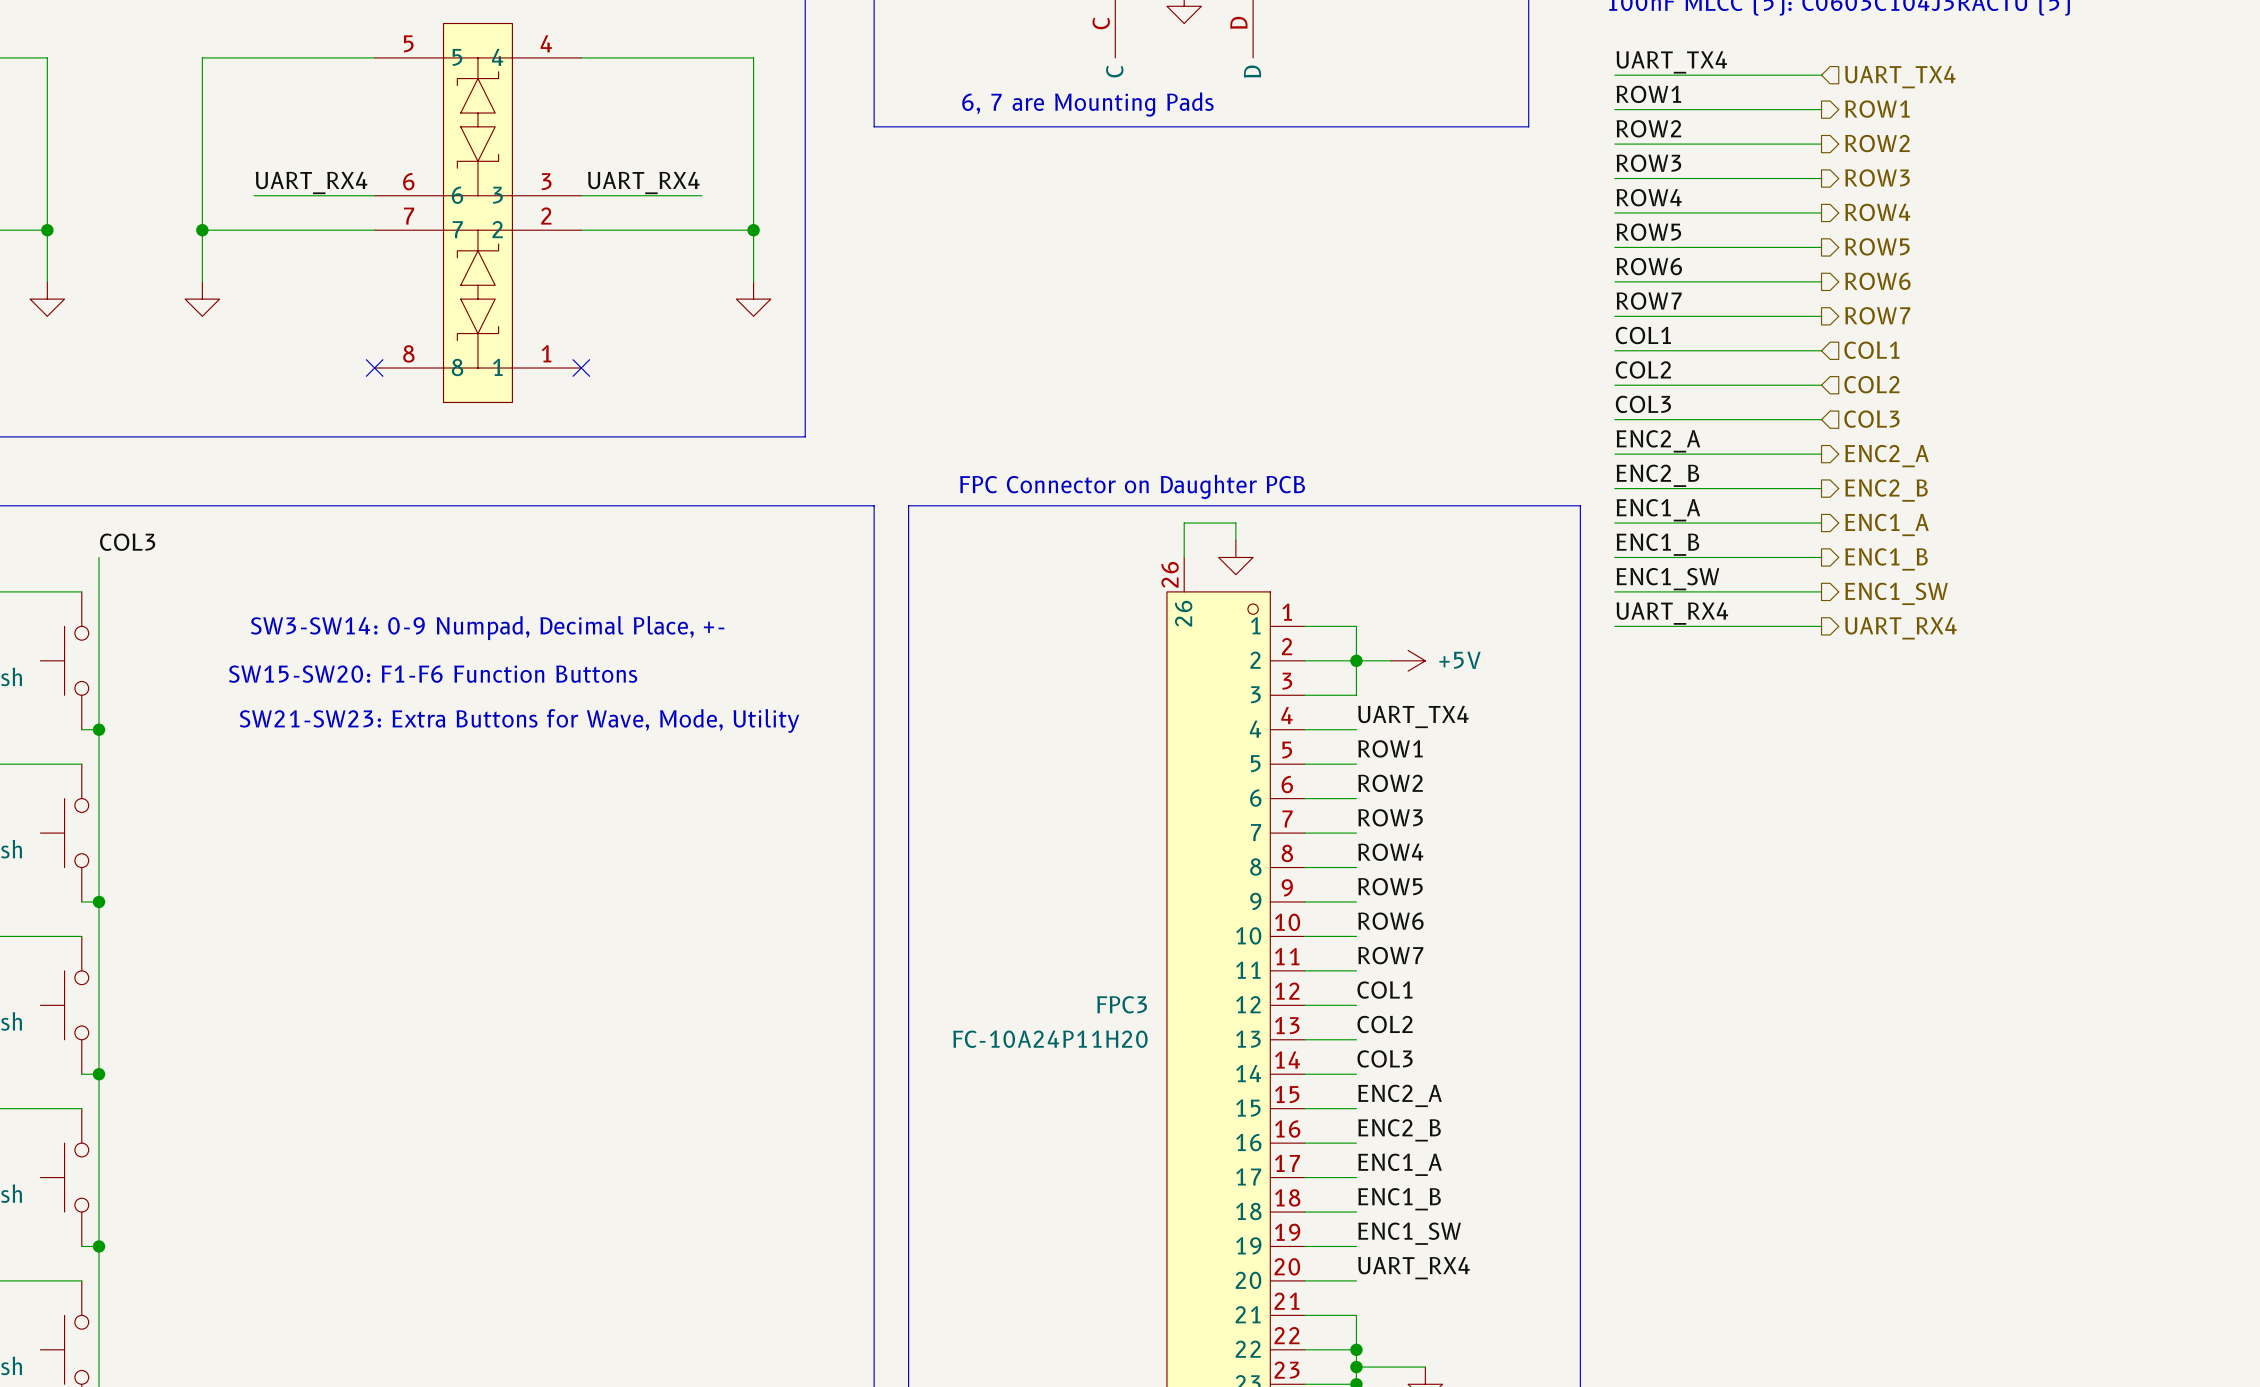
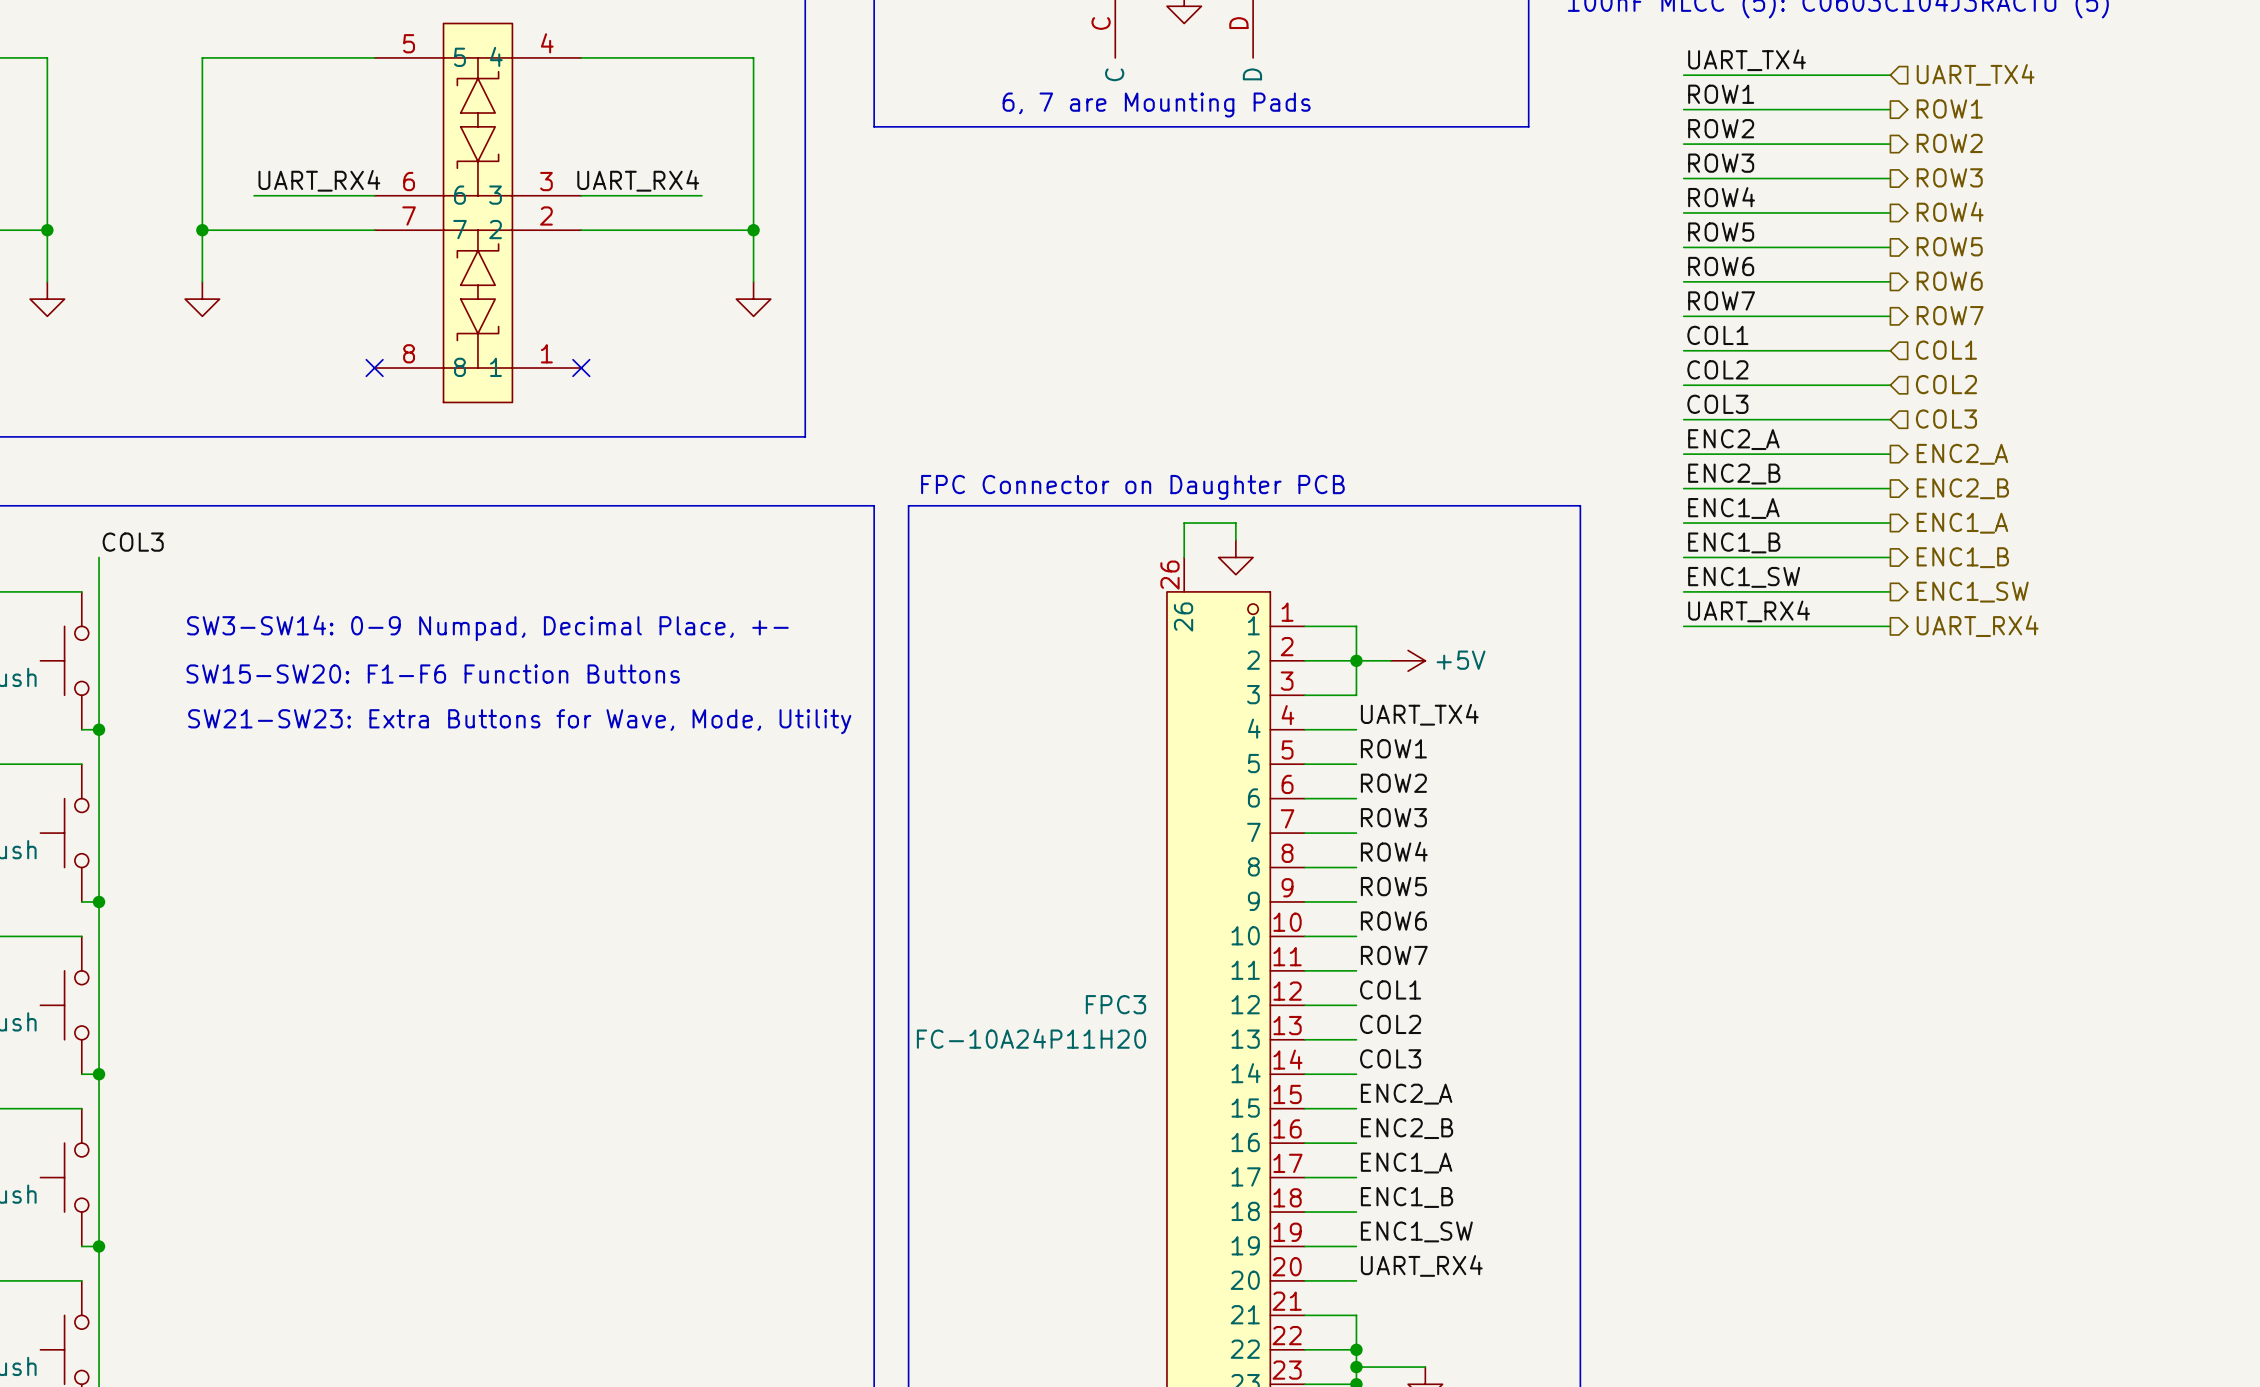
label position: UART_TX4 (1671, 62) -> UART_TX4 (1747, 60)
wire: (1614, 75) (1683, 75) -> (1821, 75) (1890, 75)
hierarchical label position: UART_TX4 (1900, 77) -> UART_TX4 (1975, 74)
label position: ROW1 (1648, 94) -> ROW1 (1721, 94)
text position: 6, 7 are Mounting Pads (1087, 104) -> 6, 7 are Mounting Pads (1156, 105)
wire: (1614, 109) (1683, 109) -> (1821, 109) (1890, 109)
hierarchical label position: ROW1 (1877, 109) -> ROW1 (1949, 108)
label position: ROW2 (1648, 128) -> ROW2 (1721, 128)
hierarchical label position: ROW2 (1877, 143) -> ROW2 (1949, 143)
wire: (1614, 144) (1683, 144) -> (1821, 144) (1890, 144)
label position: ROW3 (1648, 163) -> ROW3 (1721, 163)
hierarchical label position: ROW3 (1877, 177) -> ROW3 (1949, 177)
wire: (1614, 178) (1683, 178) -> (1821, 178) (1890, 178)
label position: ROW4 (1649, 197) -> ROW4 (1721, 197)
wire: (1614, 212) (1683, 212) -> (1821, 212) (1890, 212)
hierarchical label position: ROW4 (1877, 212) -> ROW4 (1950, 211)
label position: ROW5 (1648, 232) -> ROW5 (1721, 232)
hierarchical label position: ROW5 (1877, 246) -> ROW5 (1949, 246)
wire: (1614, 247) (1683, 247) -> (1821, 247) (1890, 247)
label position: ROW6 (1649, 266) -> ROW6 (1721, 266)
wire: (1614, 281) (1683, 281) -> (1821, 281) (1890, 281)
hierarchical label position: ROW6 (1877, 281) -> ROW6 (1949, 281)
label position: ROW7 (1649, 301) -> ROW7 (1721, 300)
hierarchical label position: ROW7 (1877, 315) -> ROW7 (1950, 315)
wire: (1614, 316) (1683, 316) -> (1821, 316) (1890, 316)
label position: COL1 (1643, 335) -> COL1 (1717, 335)
wire: (1614, 350) (1683, 350) -> (1821, 350) (1890, 350)
hierarchical label position: COL1 (1871, 350) -> COL1 (1946, 350)
label position: COL2 (1643, 369) -> COL2 (1717, 369)
hierarchical label position: COL2 (1871, 384) -> COL2 (1946, 384)
wire: (1614, 385) (1683, 385) -> (1821, 385) (1890, 385)
label position: COL3 (1643, 404) -> COL3 (1717, 404)
wire: (1614, 419) (1683, 419) -> (1821, 419) (1890, 419)
hierarchical label position: COL3 (1871, 419) -> COL3 (1946, 419)
label position: ENC2_A (1658, 441) -> ENC2_A (1733, 439)
wire: (1614, 454) (1683, 454) -> (1821, 454) (1890, 454)
hierarchical label position: ENC2_A (1886, 456) -> ENC2_A (1962, 454)
label position: ENC2_B (1657, 475) -> ENC2_B (1734, 474)
wire: (1614, 488) (1683, 488) -> (1821, 488) (1890, 488)
hierarchical label position: ENC2_B (1886, 490) -> ENC2_B (1962, 488)
label position: ENC1_A (1658, 510) -> ENC1_A (1733, 508)
wire: (1614, 523) (1683, 523) -> (1821, 523) (1890, 523)
hierarchical label position: ENC1_A (1886, 524) -> ENC1_A (1962, 523)
label position: ENC1_B (1657, 544) -> ENC1_B (1734, 542)
wire: (1614, 557) (1683, 557) -> (1821, 557) (1890, 557)
hierarchical label position: ENC1_B (1886, 559) -> ENC1_B (1962, 557)
label position: ENC1_SW (1667, 579) -> ENC1_SW (1744, 577)
wire: (1614, 591) (1683, 591) -> (1821, 591) (1890, 591)
hierarchical label position: ENC1_SW (1896, 593) -> ENC1_SW (1972, 592)
label position: UART_RX4 (1672, 613) -> UART_RX4 (1749, 611)
wire: (1614, 626) (1683, 626) -> (1821, 626) (1890, 626)
hierarchical label position: UART_RX4 (1900, 628) -> UART_RX4 (1977, 626)

